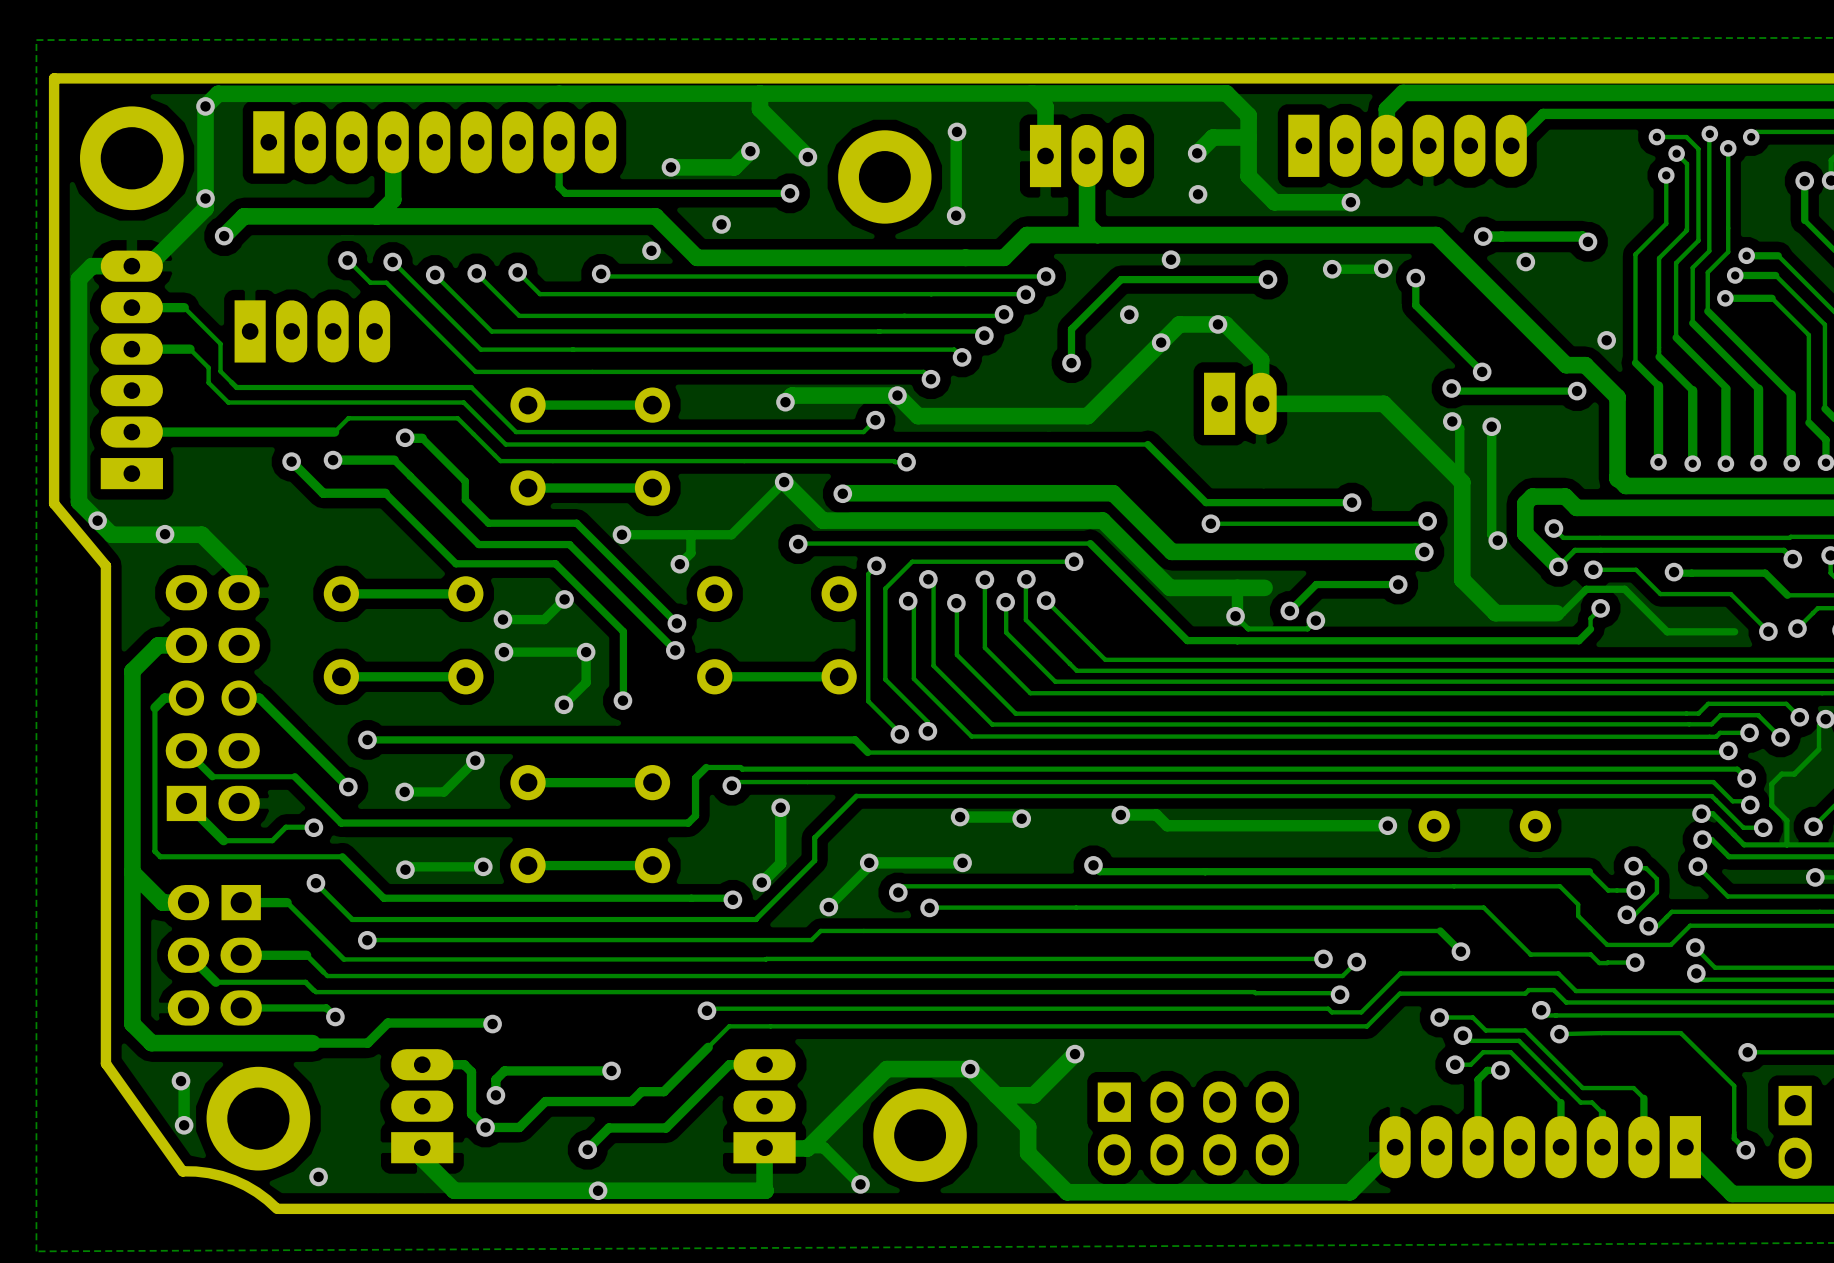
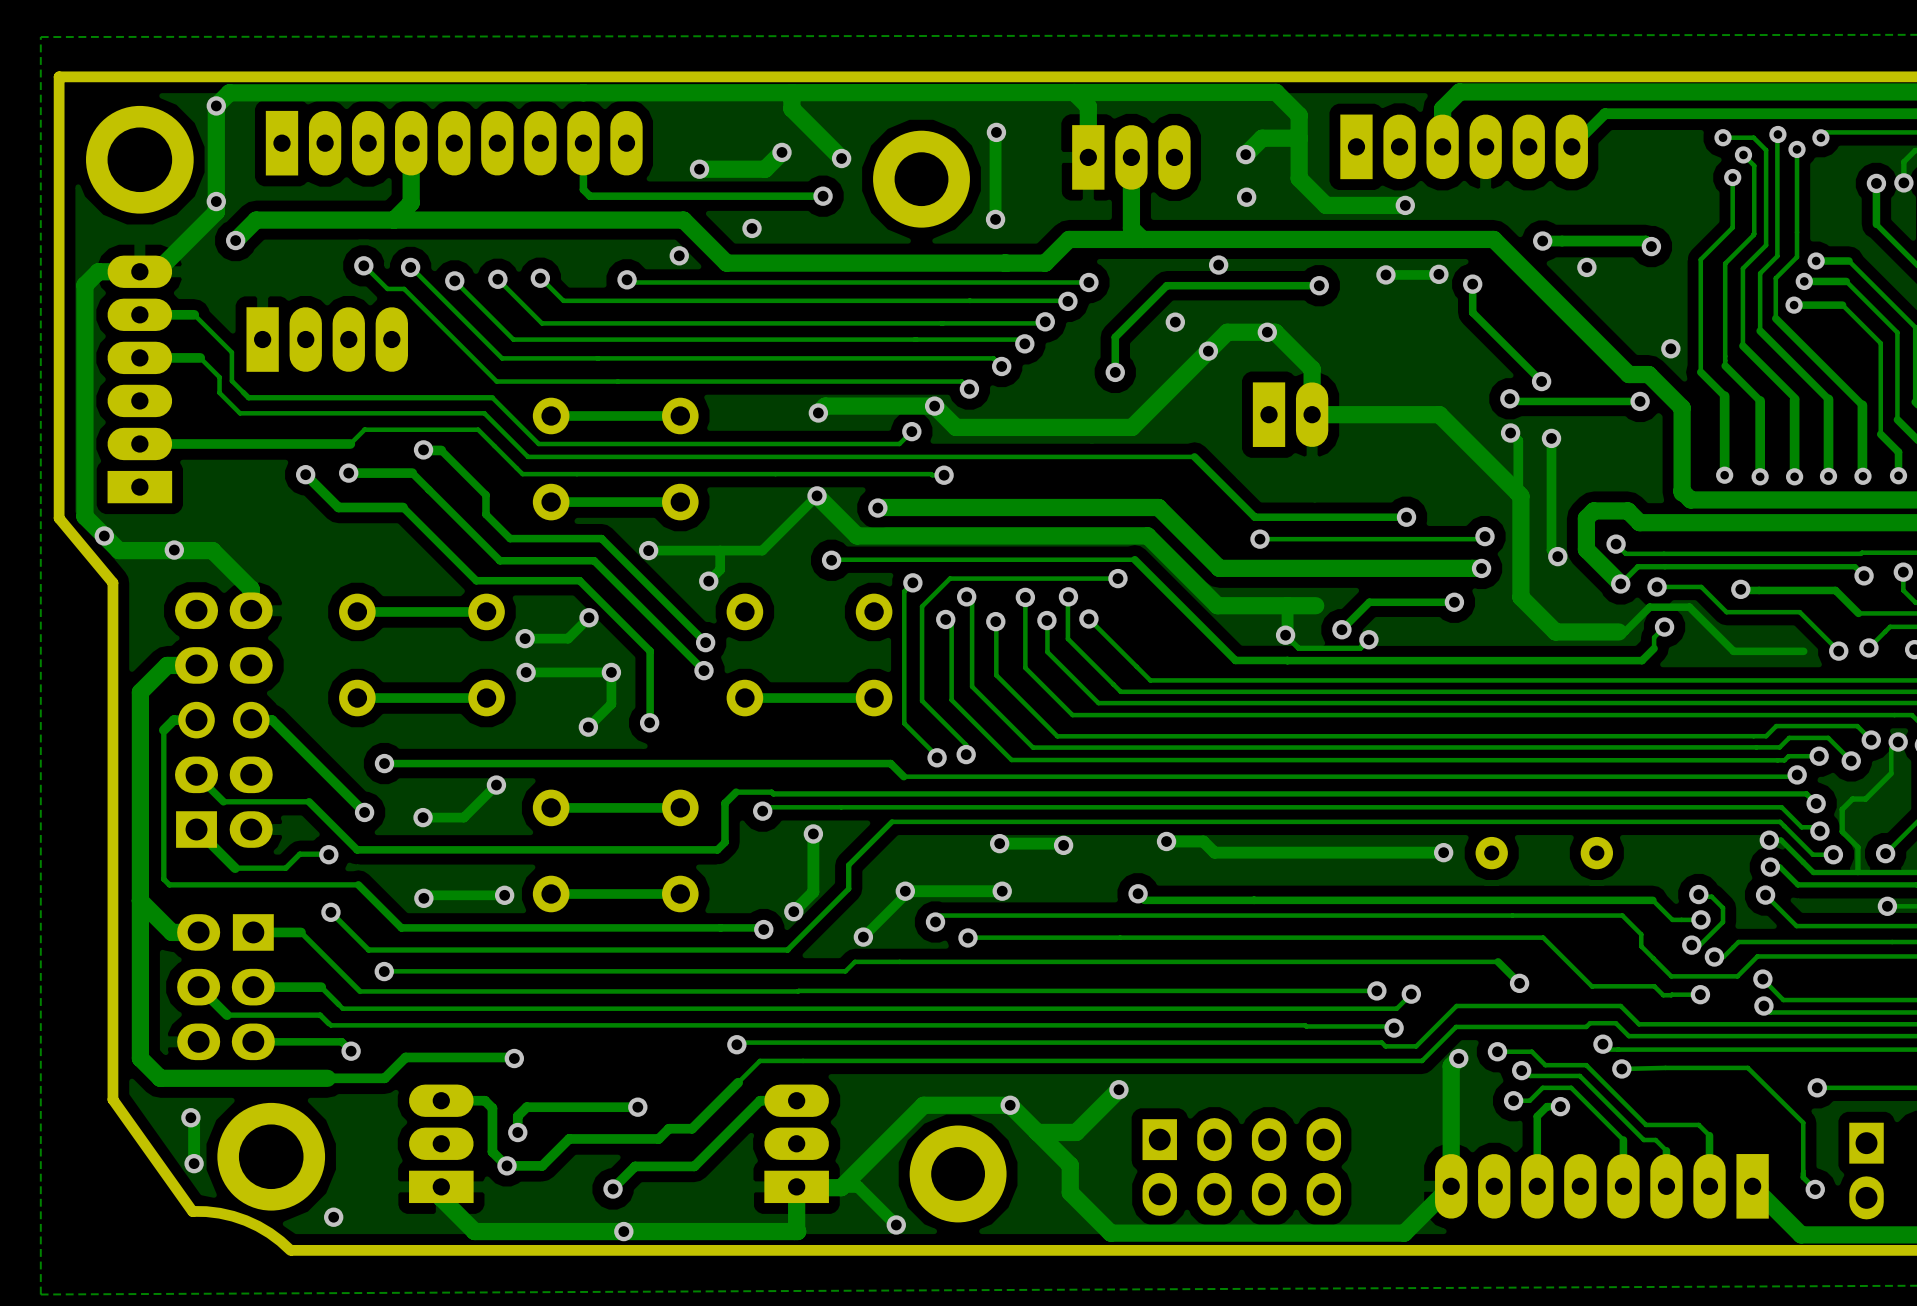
track: none -> (1458, 1058) (1451, 1066) (1451, 1186)
via: none -> (1458, 1058)

